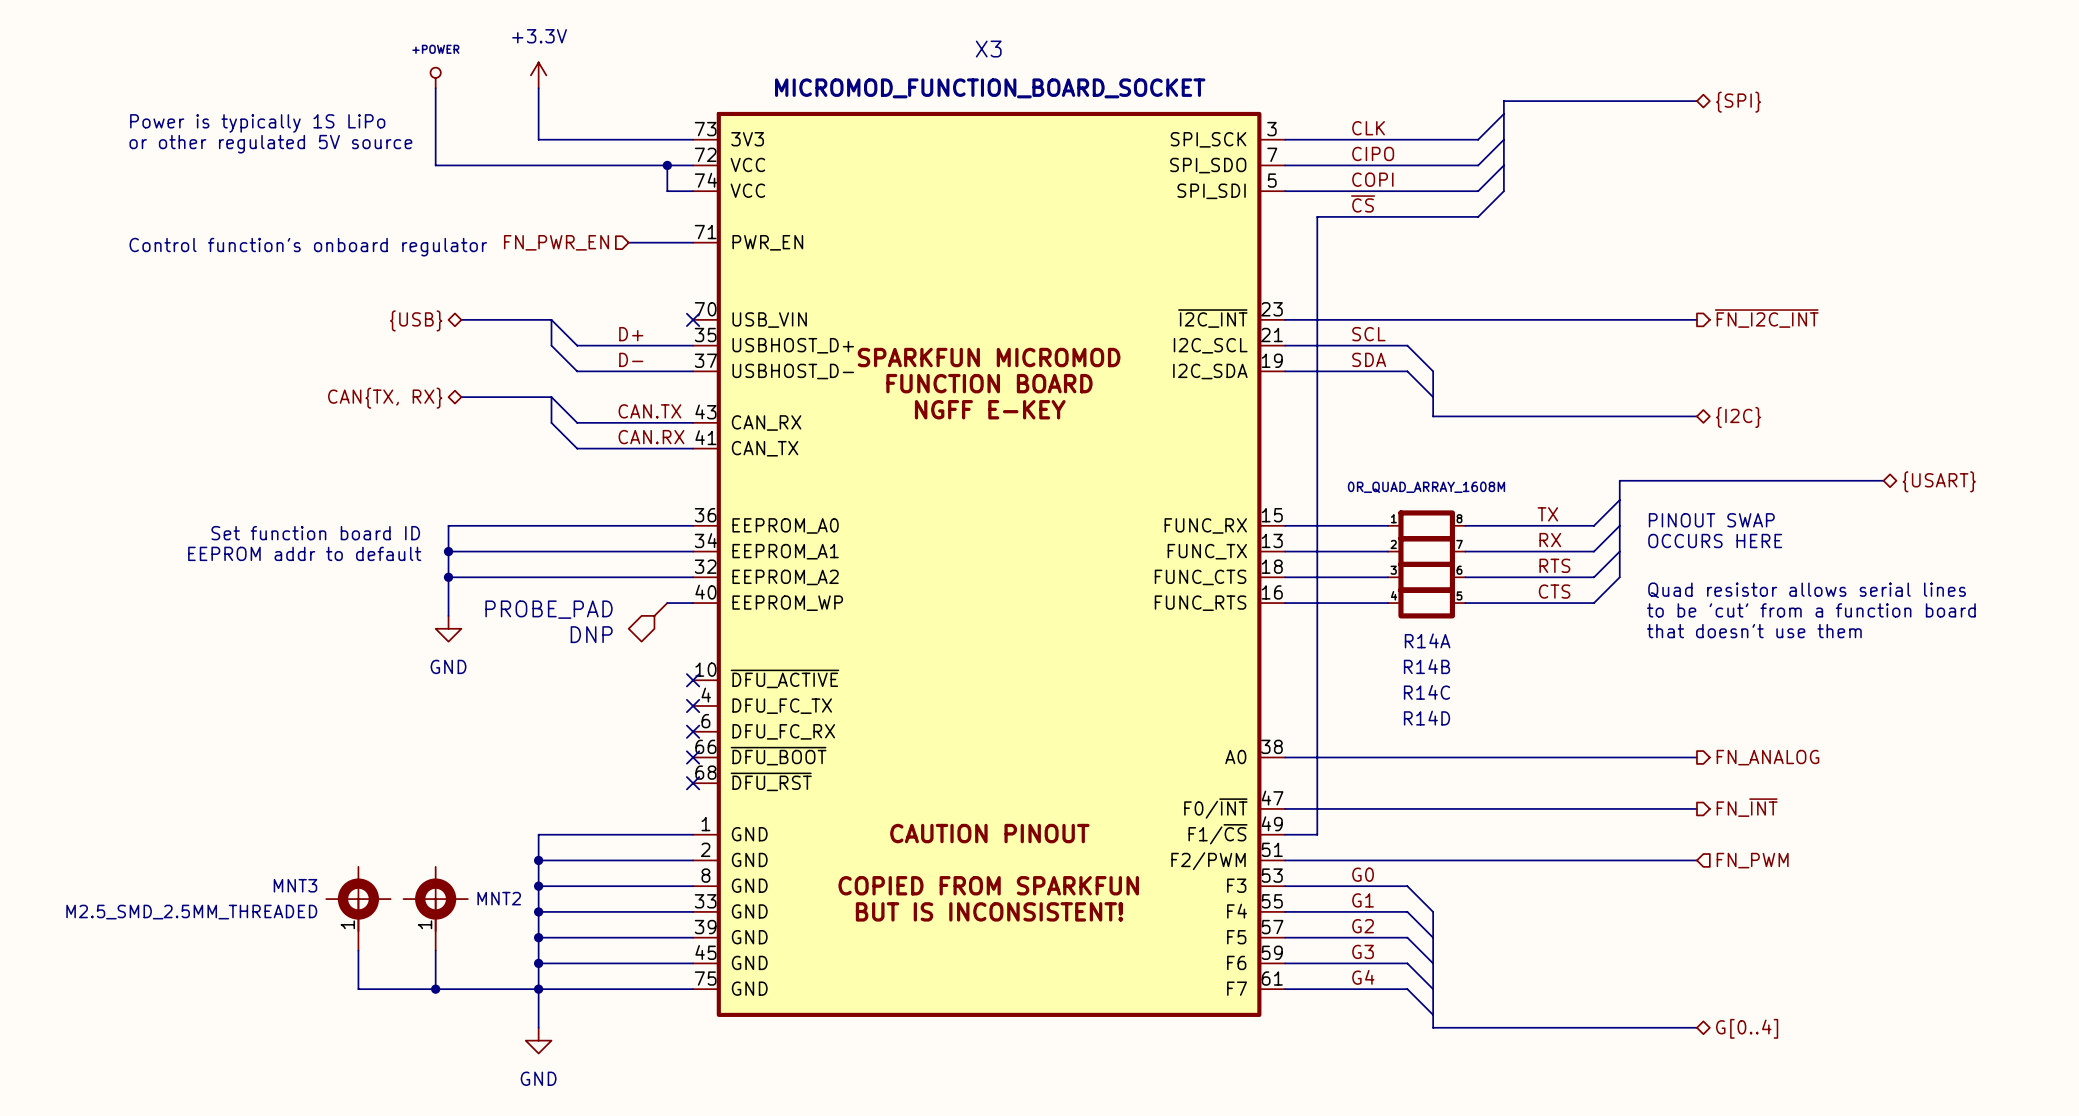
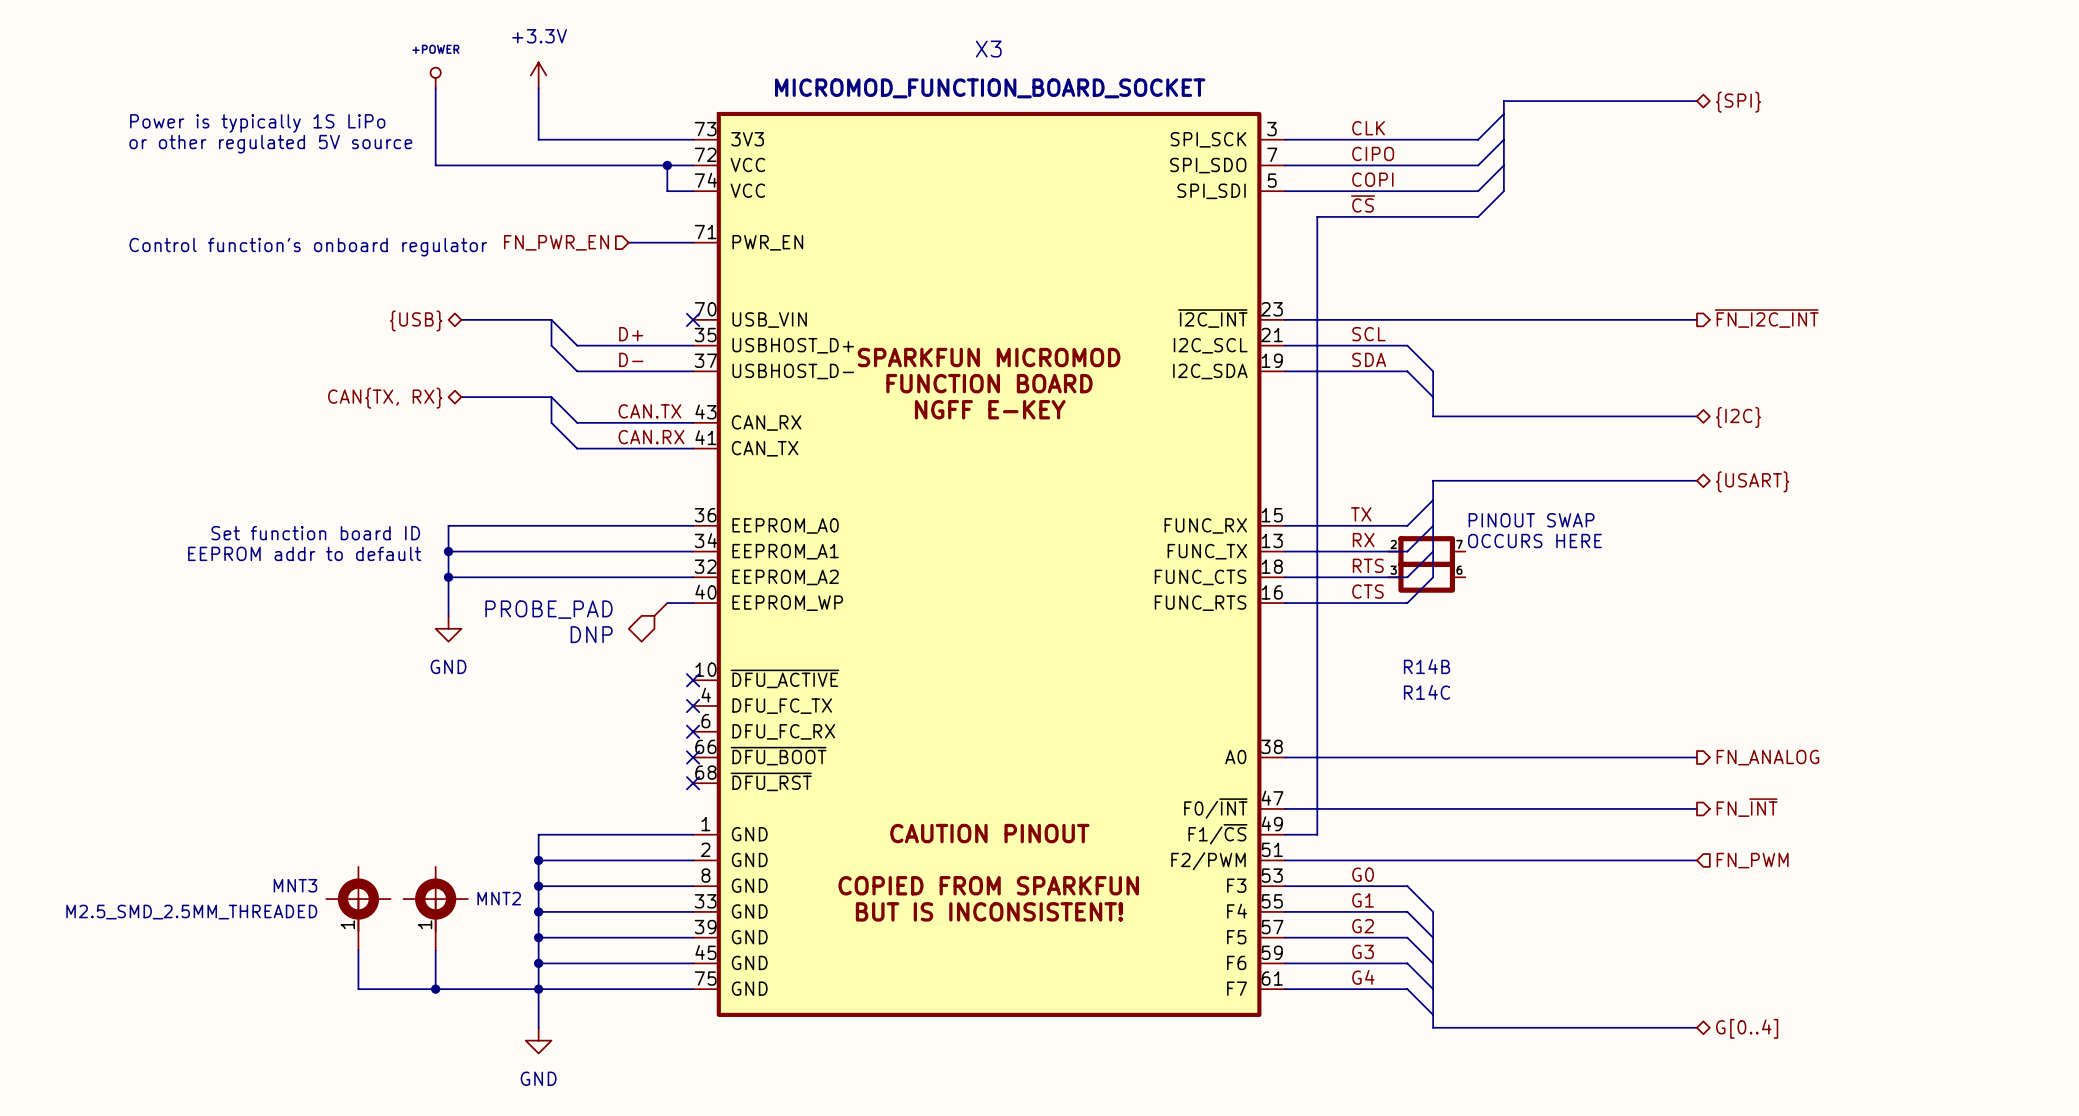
bus: (1619, 480) (1619, 577) -> (1619, 480) (1433, 480) (1433, 577)
bus: (1696, 480) (1883, 480) -> none
hierarchical label position: {USART} (1939, 481) -> {USART} (1752, 481)
wire: none -> (1433, 500) (1407, 525) (1388, 525)
wire: (1619, 500) (1594, 525) (1465, 525) -> none
label position: TX (1547, 514) -> TX (1361, 514)
text position: PINOUT SWAP (1711, 520) -> PINOUT SWAP (1531, 520)
R14A: 0R_QUAD_ARRAY_1608M (1426, 525) -> none
wire: none -> (1433, 525) (1407, 551) (1388, 551)
wire: (1619, 525) (1594, 551) (1465, 551) -> none
label position: RX (1550, 540) -> RX (1363, 540)
text position: OCCURS HERE (1715, 541) -> OCCURS HERE (1534, 541)
wire: none -> (1433, 551) (1407, 577) (1388, 577)
wire: (1619, 551) (1594, 577) (1465, 577) -> none
label position: RTS (1554, 565) -> RTS (1368, 565)
wire: none -> (1433, 577) (1407, 603) (1388, 603)
wire: (1619, 577) (1594, 603) (1465, 603) -> none
text: Quad resistor allows serial lines (1807, 590) -> none
label position: CTS (1554, 591) -> CTS (1367, 591)
R14D: (1426, 603) -> none
text: to be 'cut' from a function board (1811, 610) -> none
text: that doesn't use them (1754, 631) -> none

